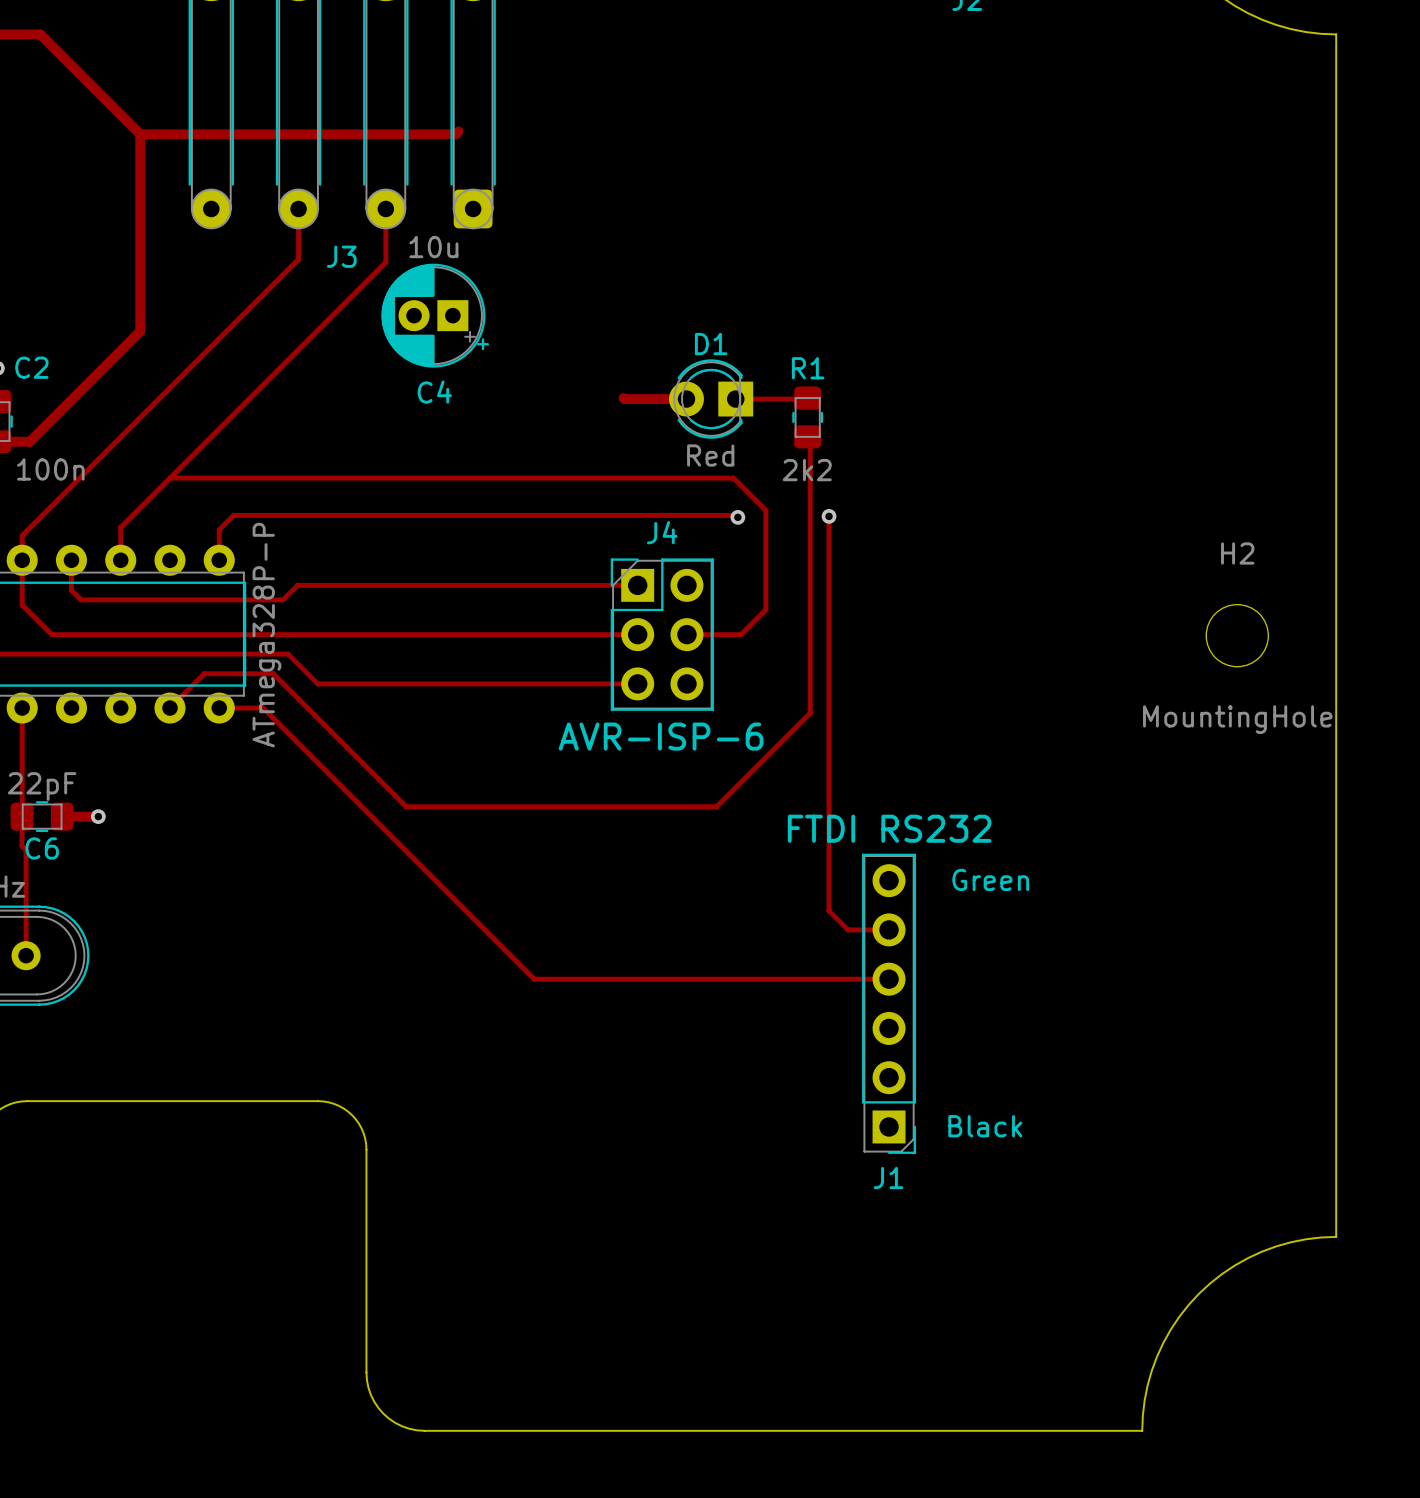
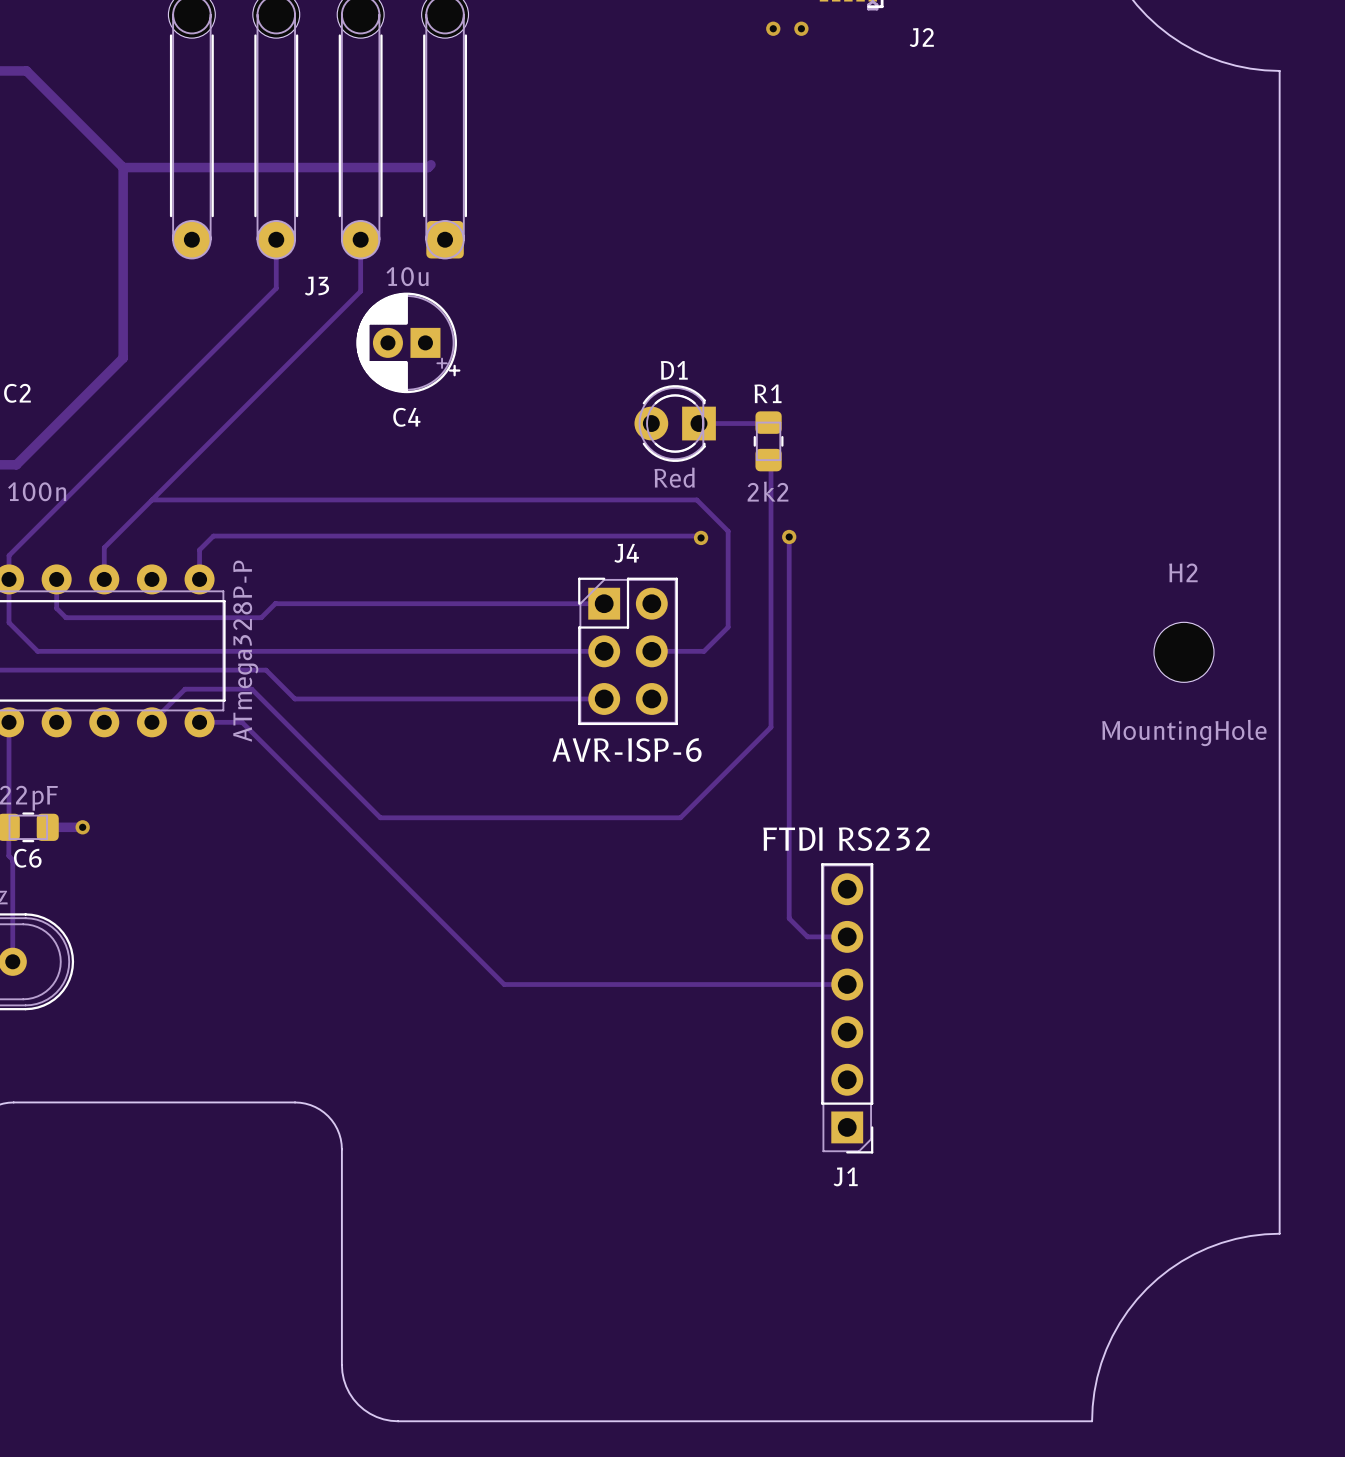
track: (623, 398) (686, 399) -> none
text: Green (990, 879) -> none
text: Black (985, 1126) -> none

